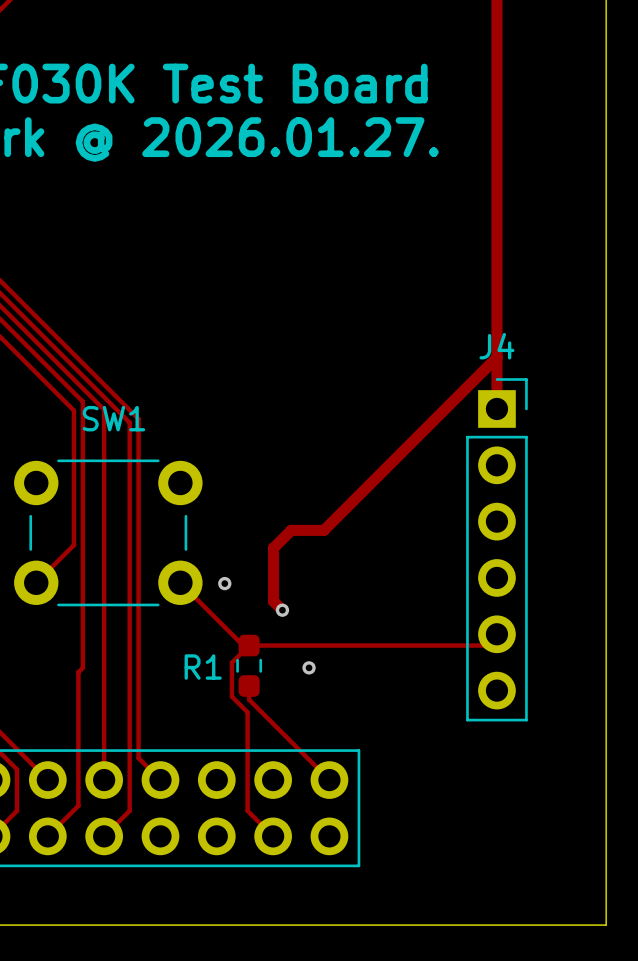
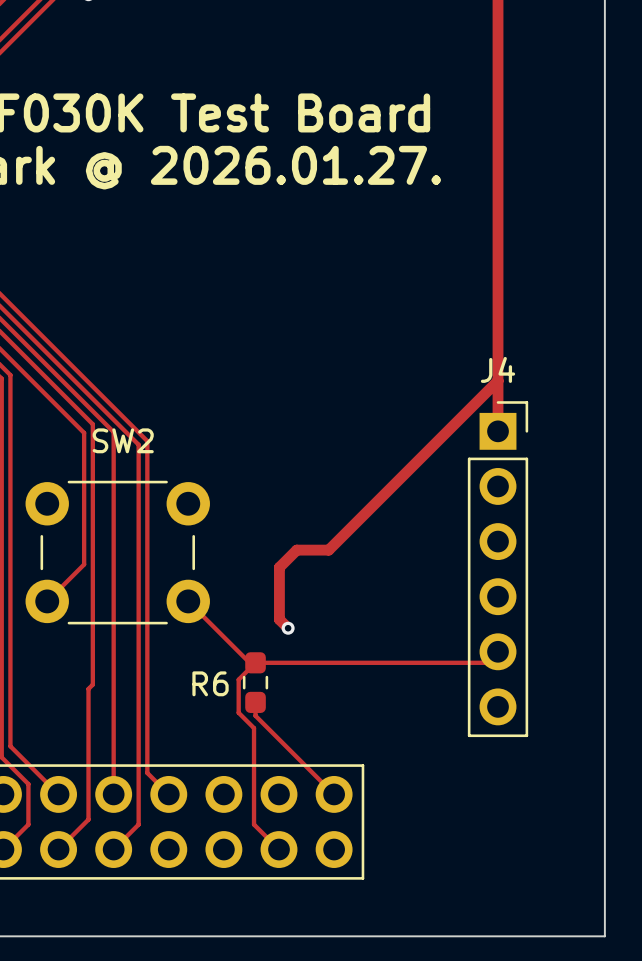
SW1 name: SW1 (113, 418) -> SW2 (123, 440)
via: (224, 583) -> none
R1 name: R1 (203, 667) -> R6 (210, 683)
via: (309, 667) -> none

